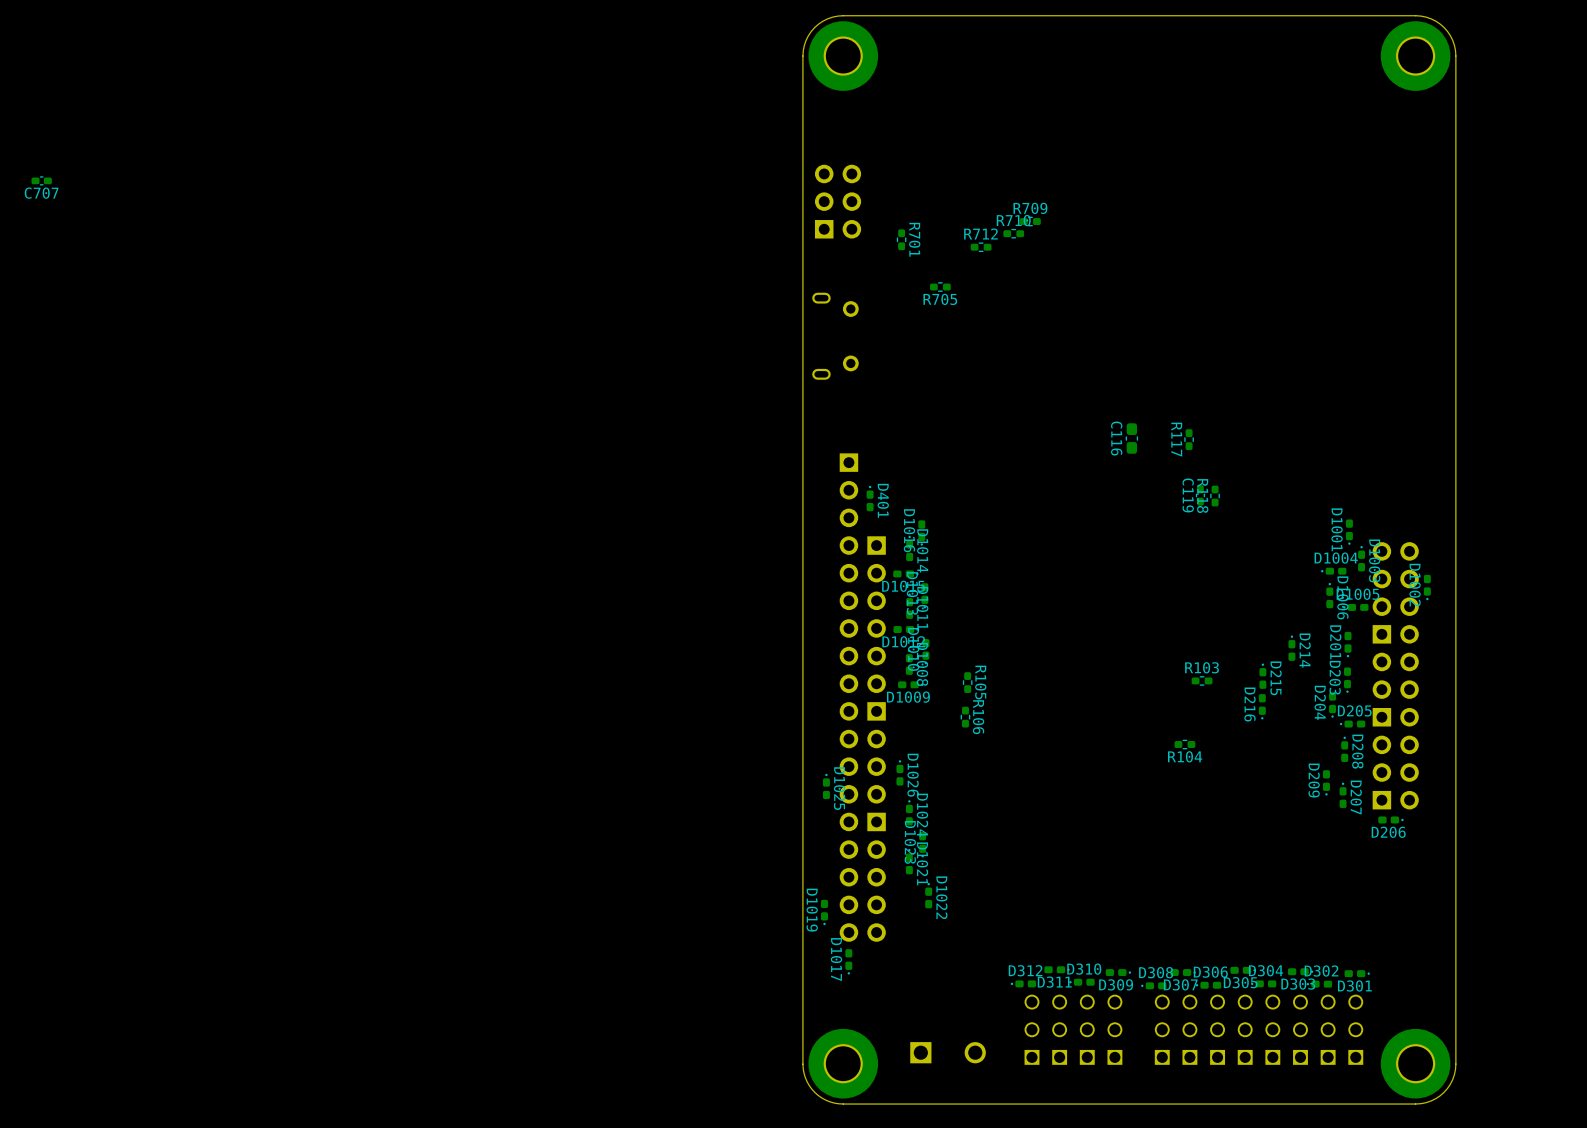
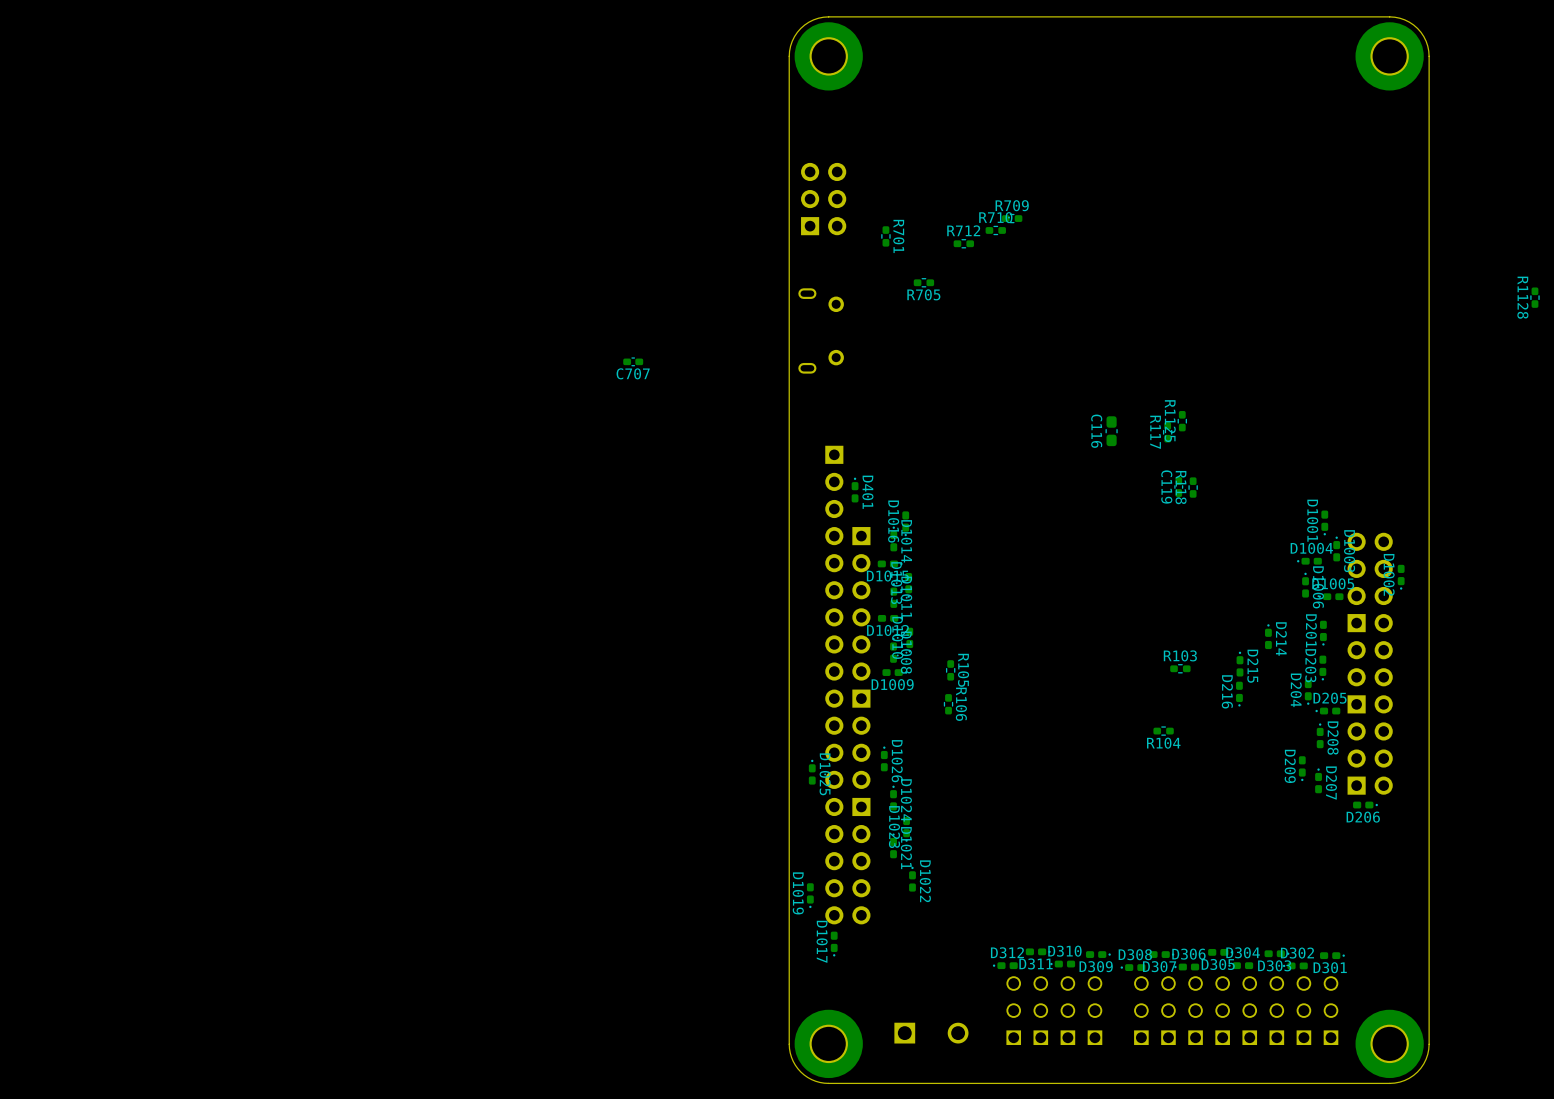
C707 position: (41, 180) -> (633, 361)
R1128: none -> (1534, 297)
R1125: none -> (1182, 421)

